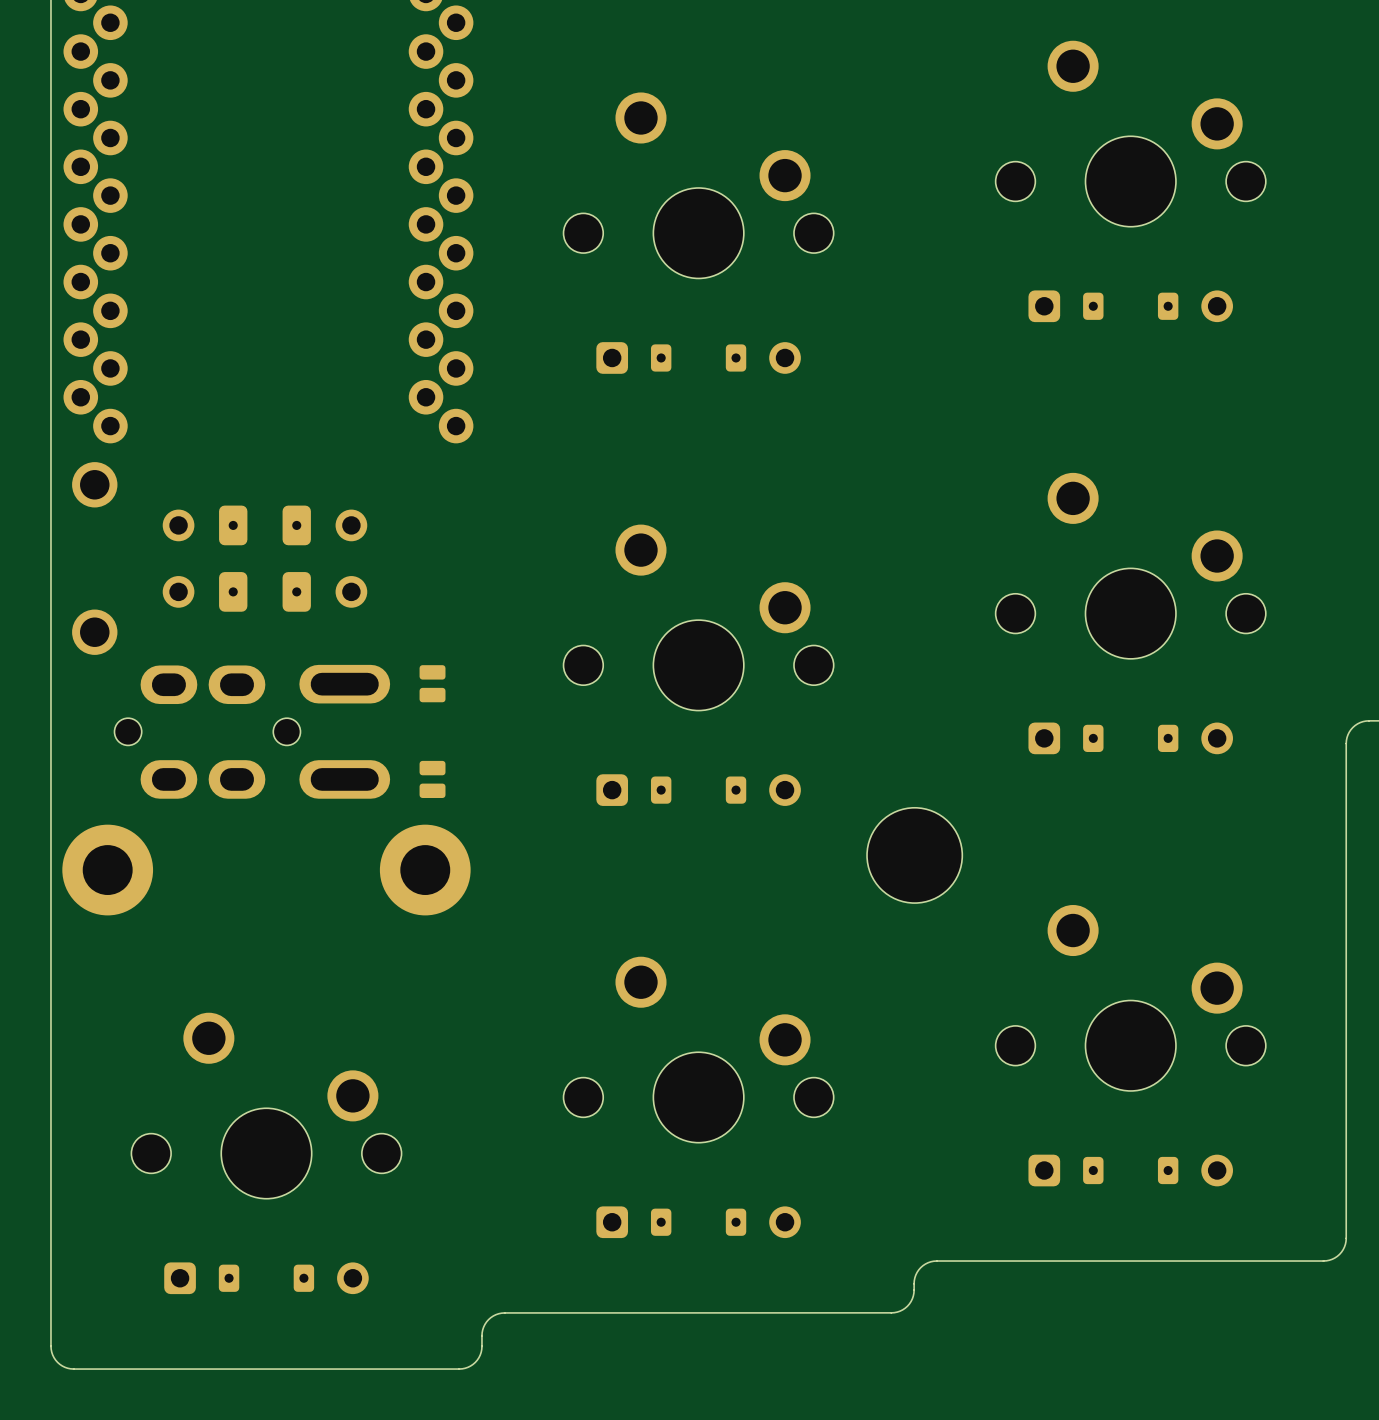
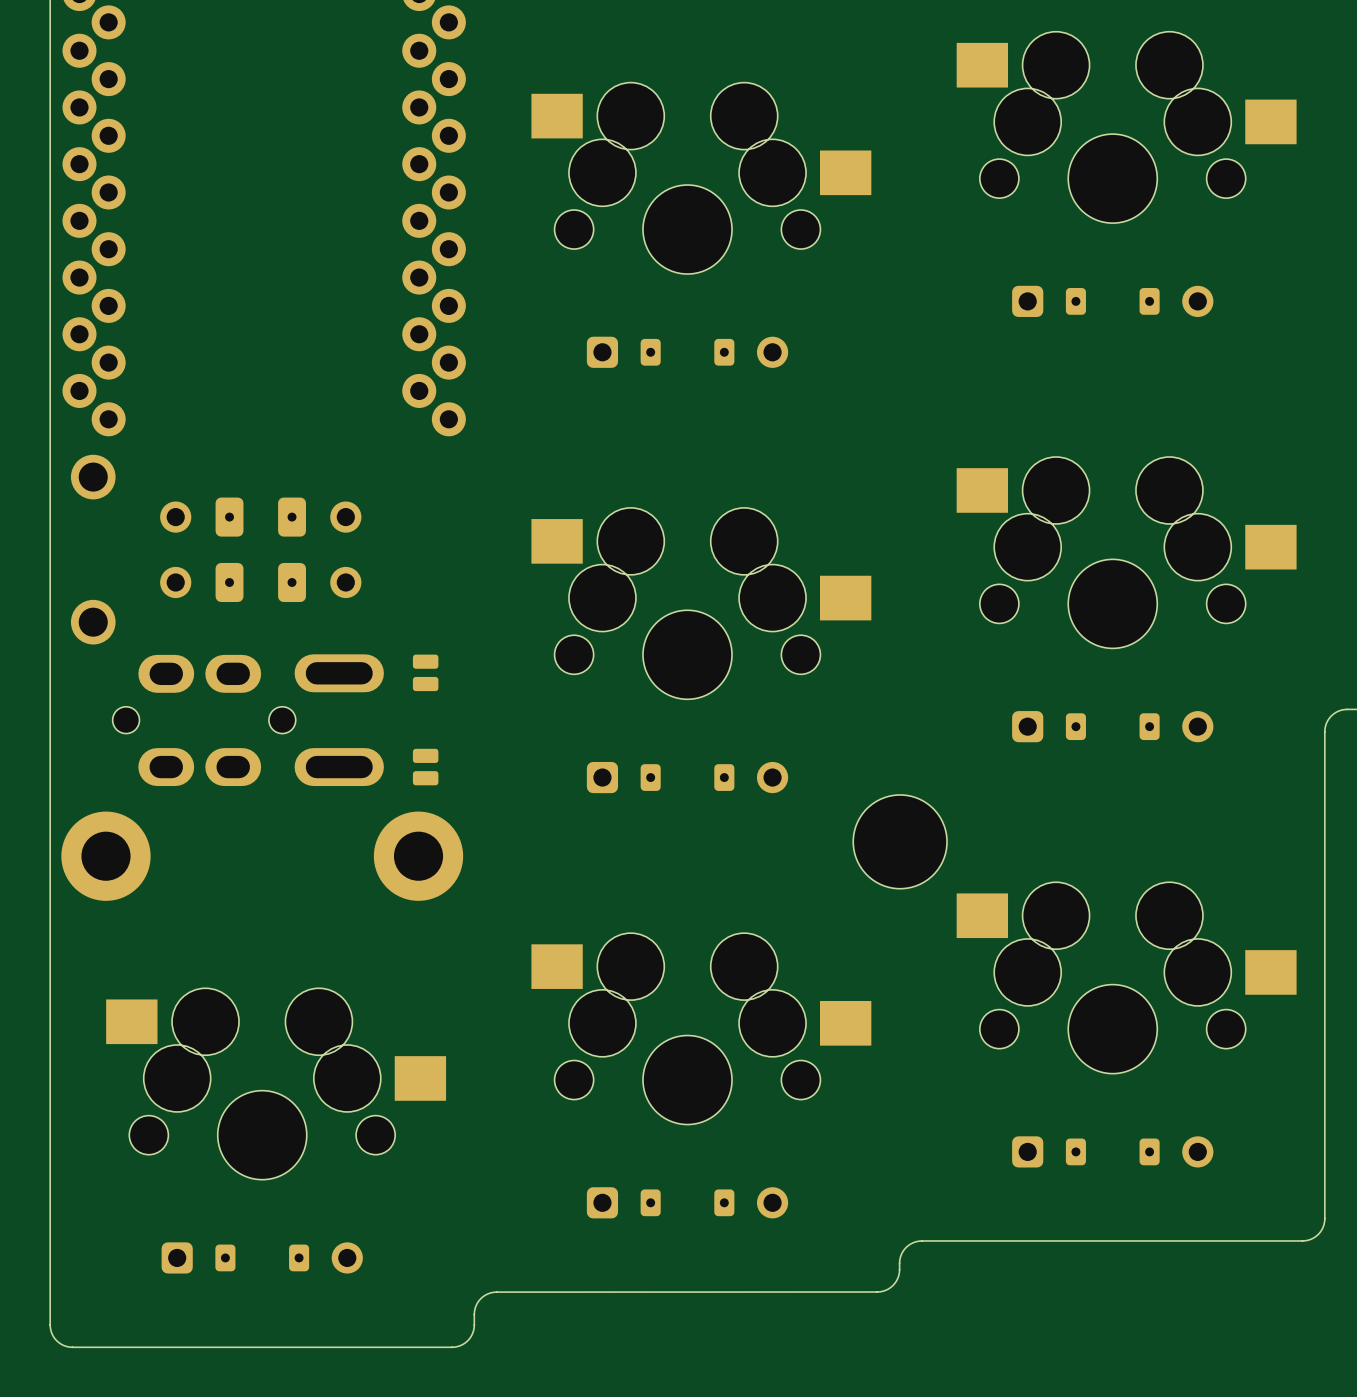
part footprint: [995, 40, 1266, 227] -> [956, 31, 1297, 224]
part footprint: [563, 92, 834, 279] -> [531, 82, 872, 275]
part footprint: [995, 472, 1266, 659] -> [956, 456, 1297, 649]
part footprint: [563, 524, 834, 711] -> [531, 507, 872, 700]
part footprint: [995, 904, 1266, 1091] -> [956, 882, 1297, 1074]
part footprint: [563, 956, 834, 1143] -> [531, 933, 872, 1125]
part footprint: [131, 1012, 402, 1199] -> [106, 988, 447, 1180]

